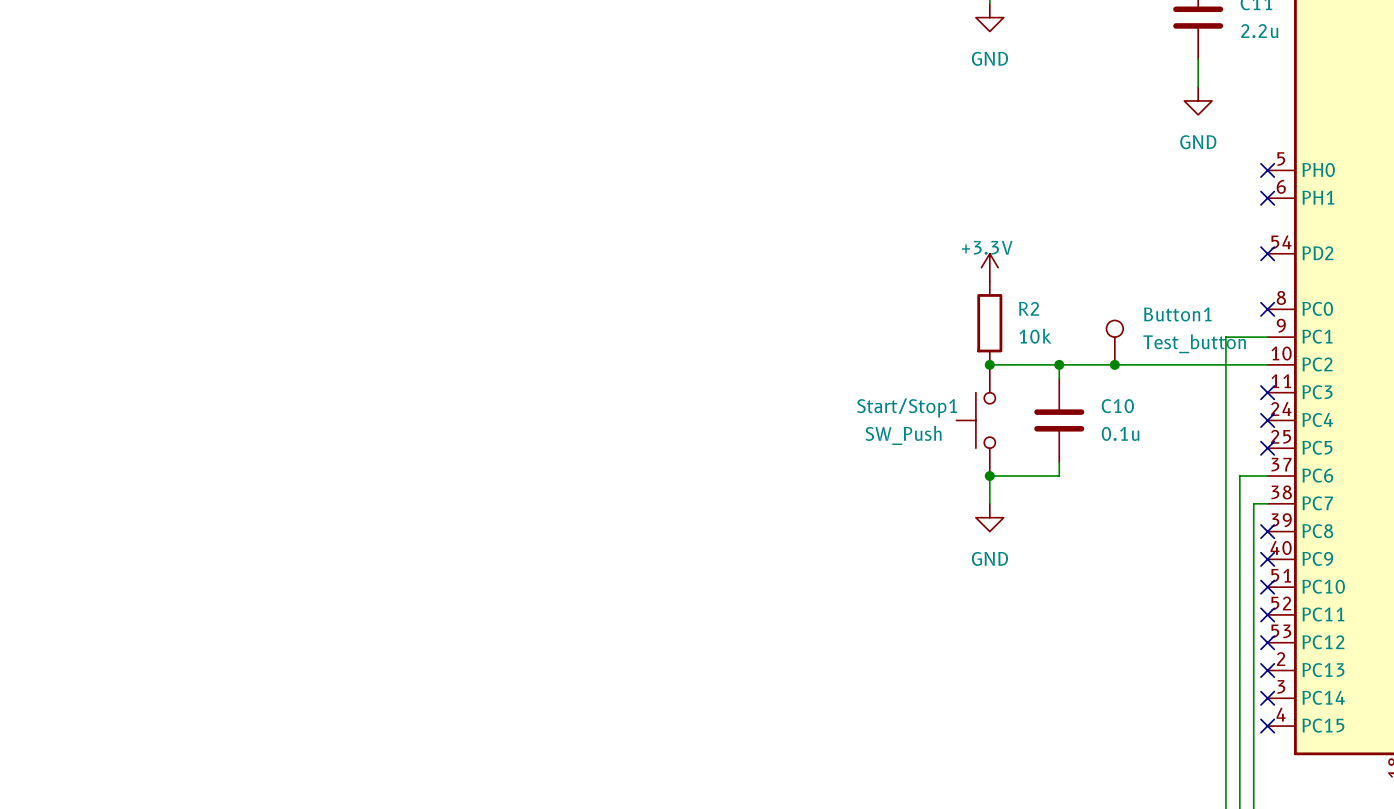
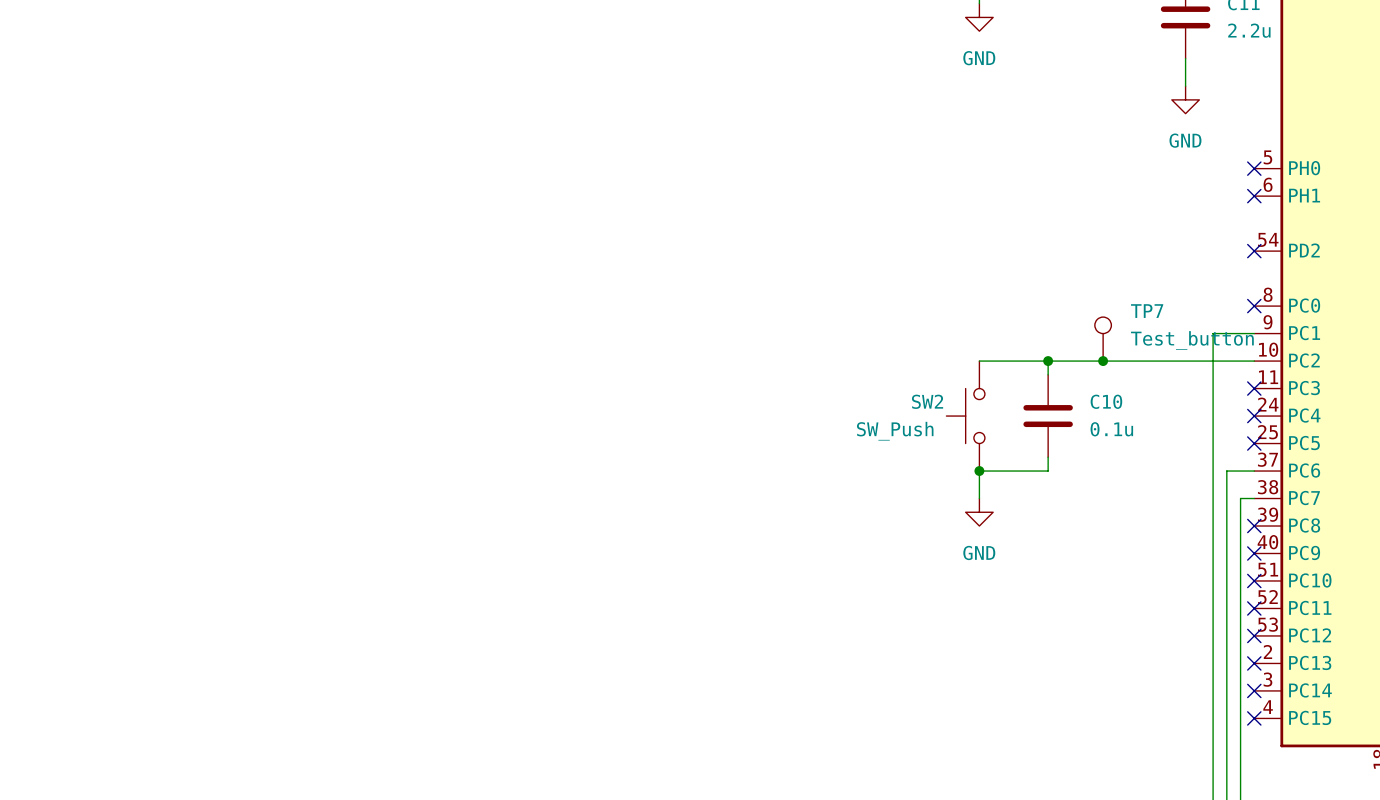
power symbol: +3.3V (989, 267) -> none
Button1 name: Button1 (1177, 314) -> TP7 (1147, 311)
R2: 10k (989, 323) -> none
junction: (989, 364) -> none
Start/Stop1 name: Start/Stop1 (907, 407) -> SW2 (927, 401)

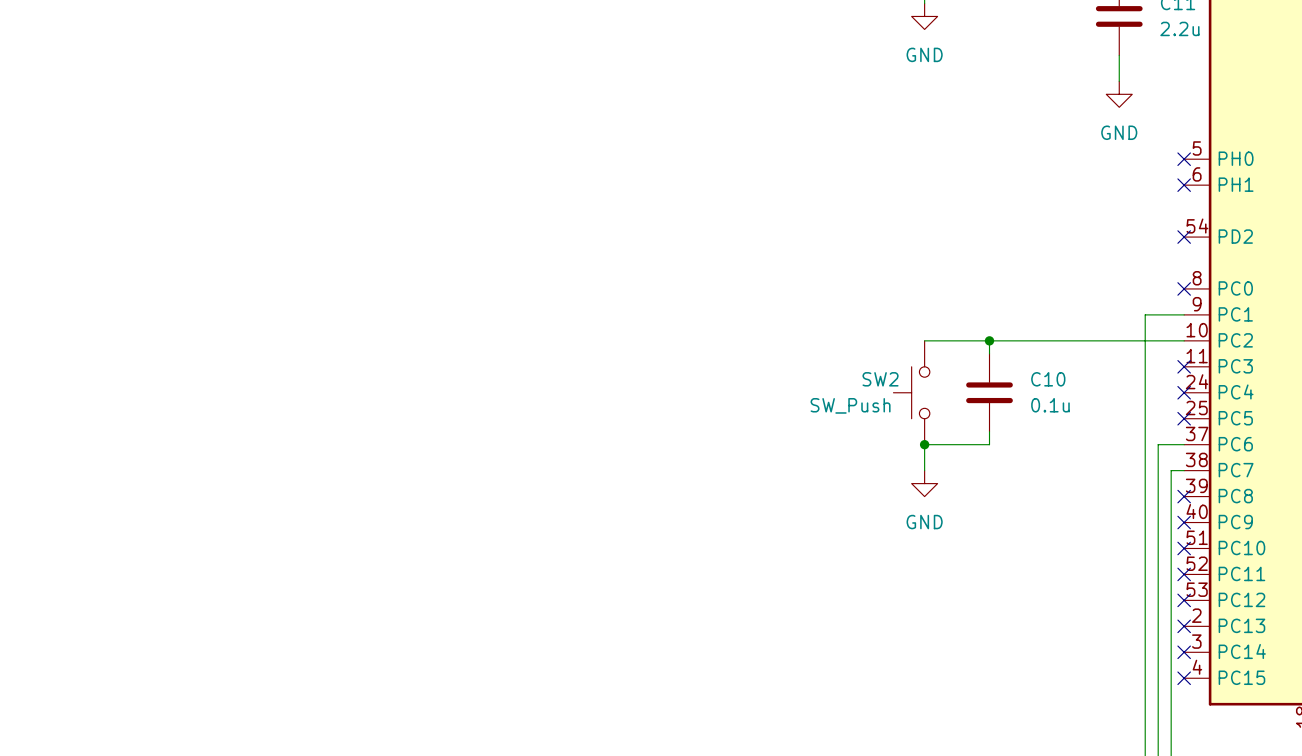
TP7: Test_button (1103, 339) -> none
junction: (1103, 361) -> none

